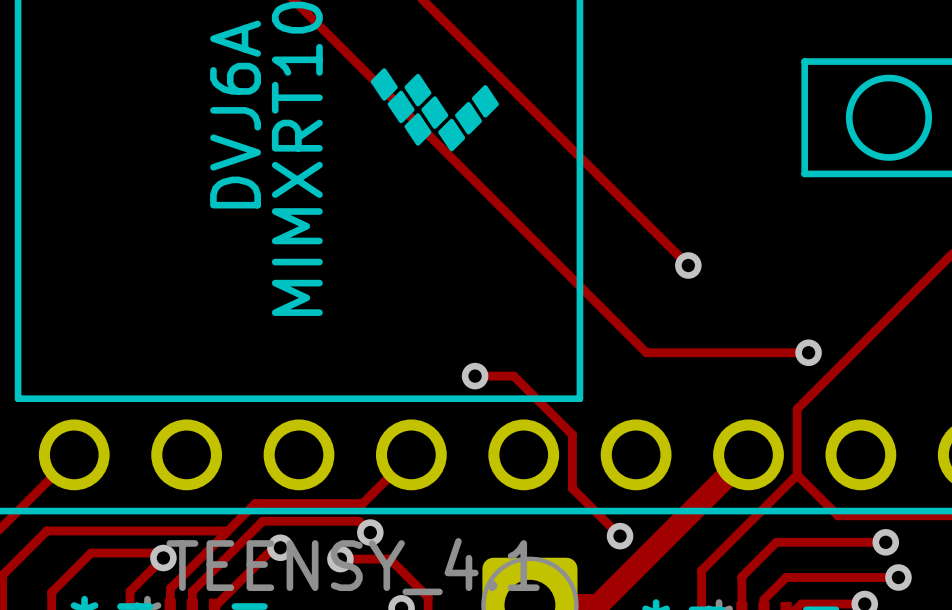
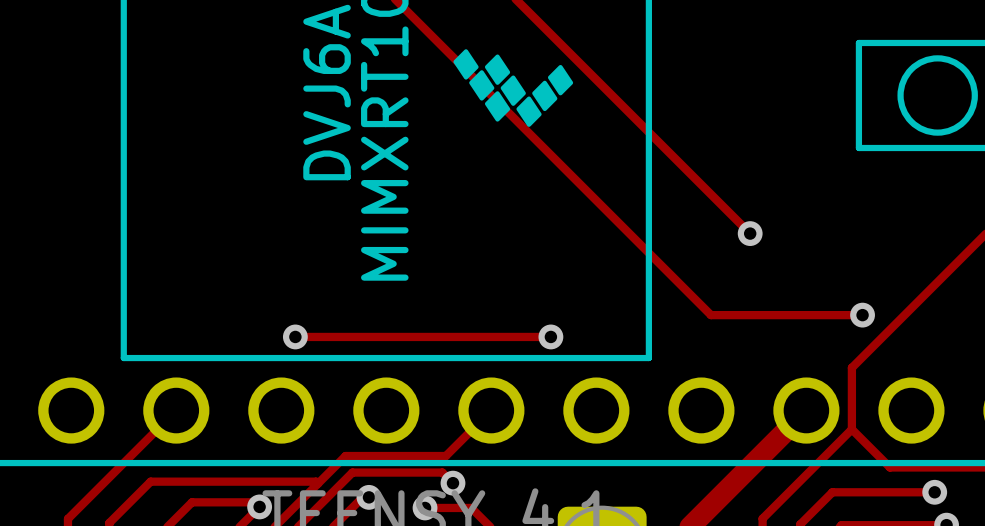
via: none -> (295, 336)
track: (475, 376) (513, 376) (572, 434) (572, 488) (620, 536) -> (550, 336) (290, 336)
via: (620, 536) -> none

